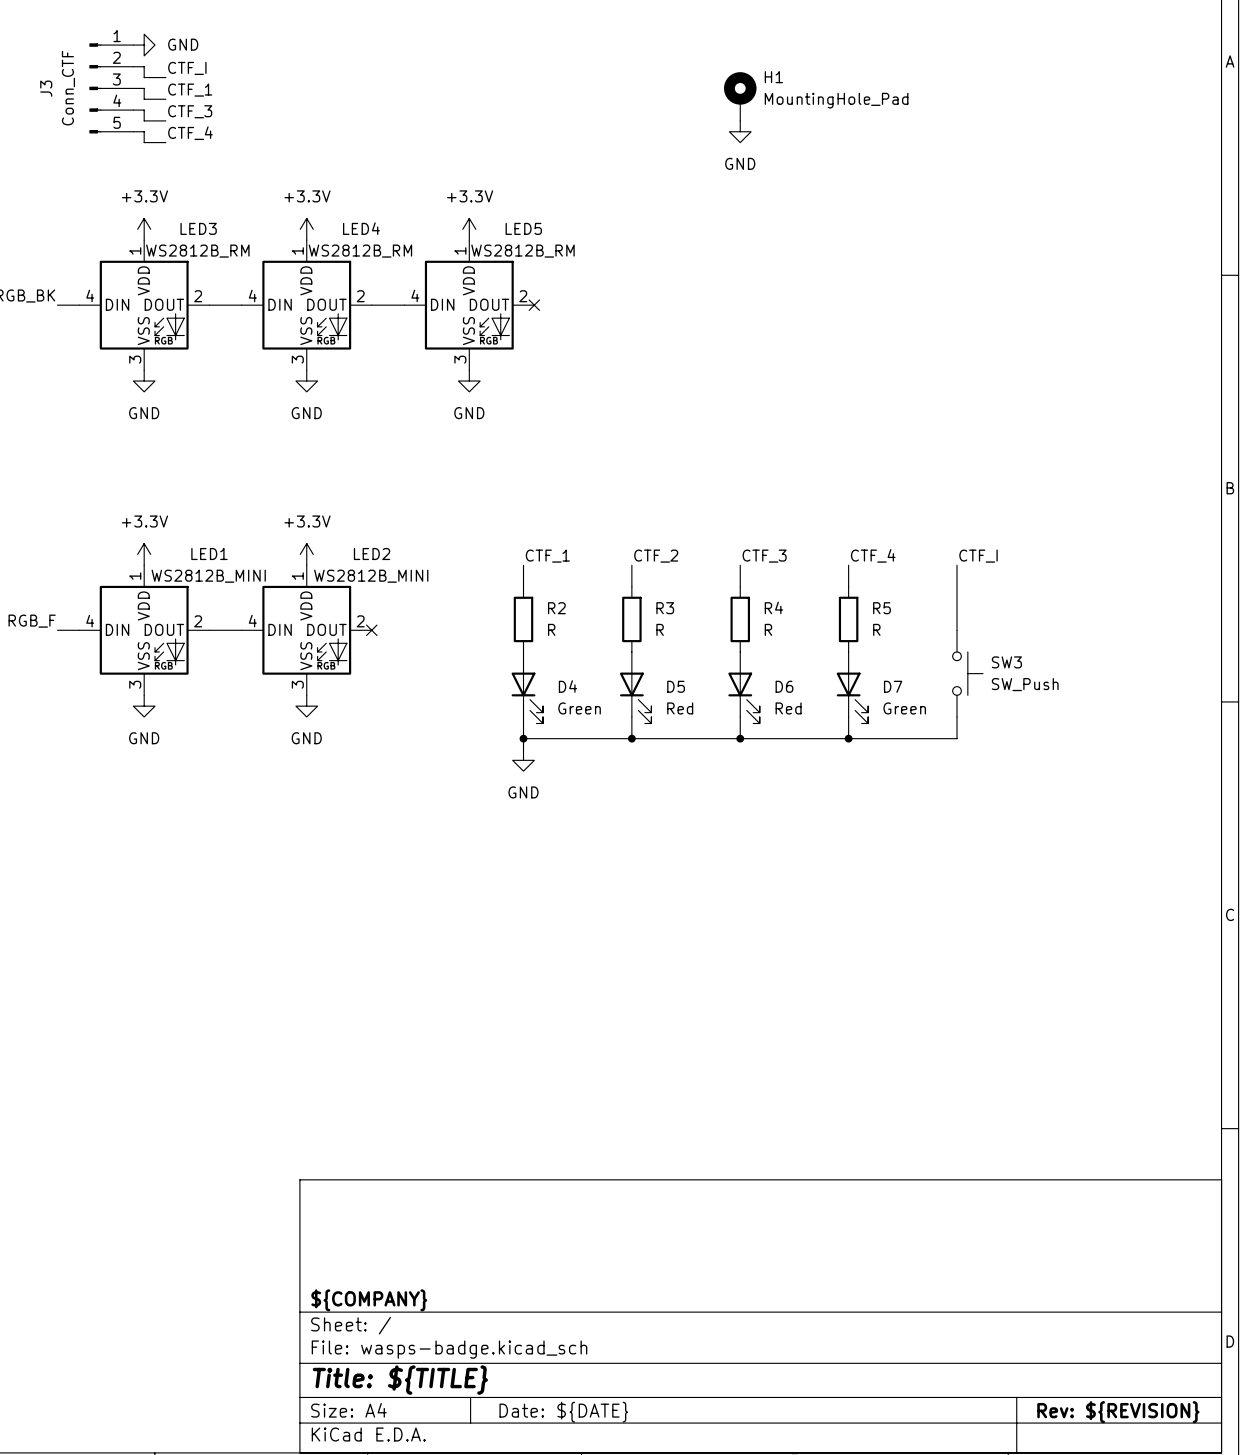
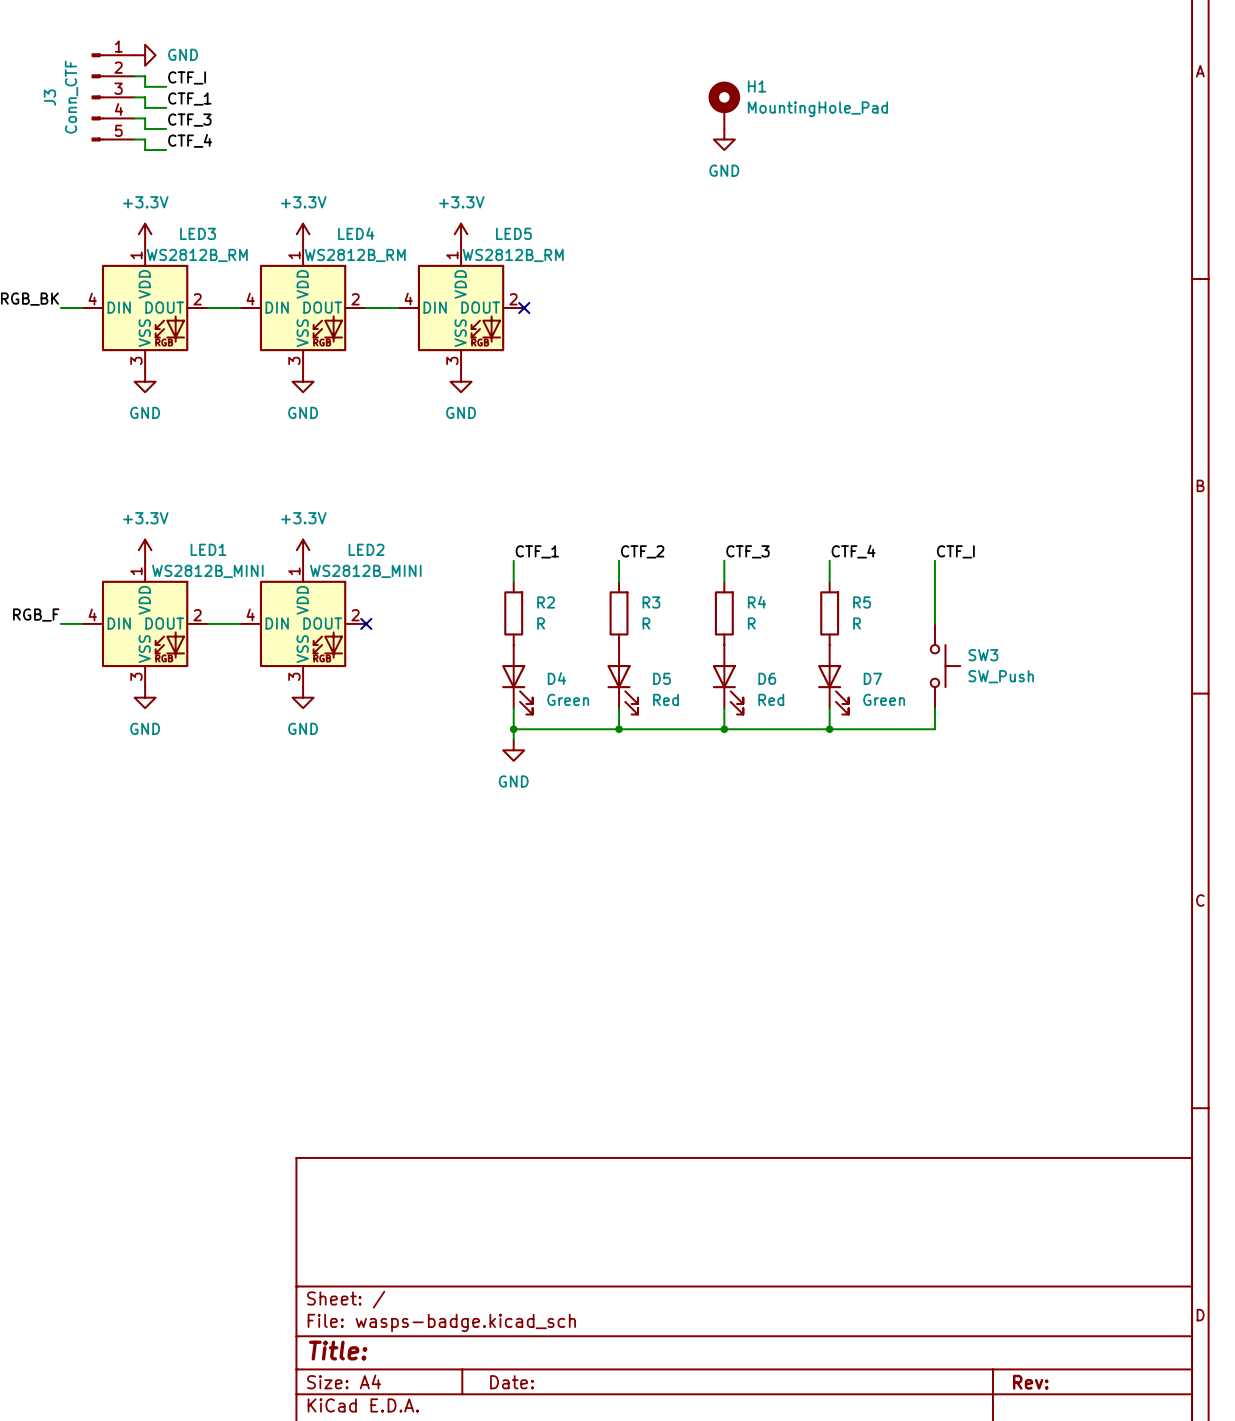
title block: ${COMPANY} (369, 1300) -> none
title block: Title: ${TITLE} (400, 1380) -> Title: (338, 1350)
title block: Date: ${DATE} (563, 1412) -> Date: (512, 1382)
title block: Rev: ${REVISION} (1118, 1412) -> Rev: (1030, 1382)

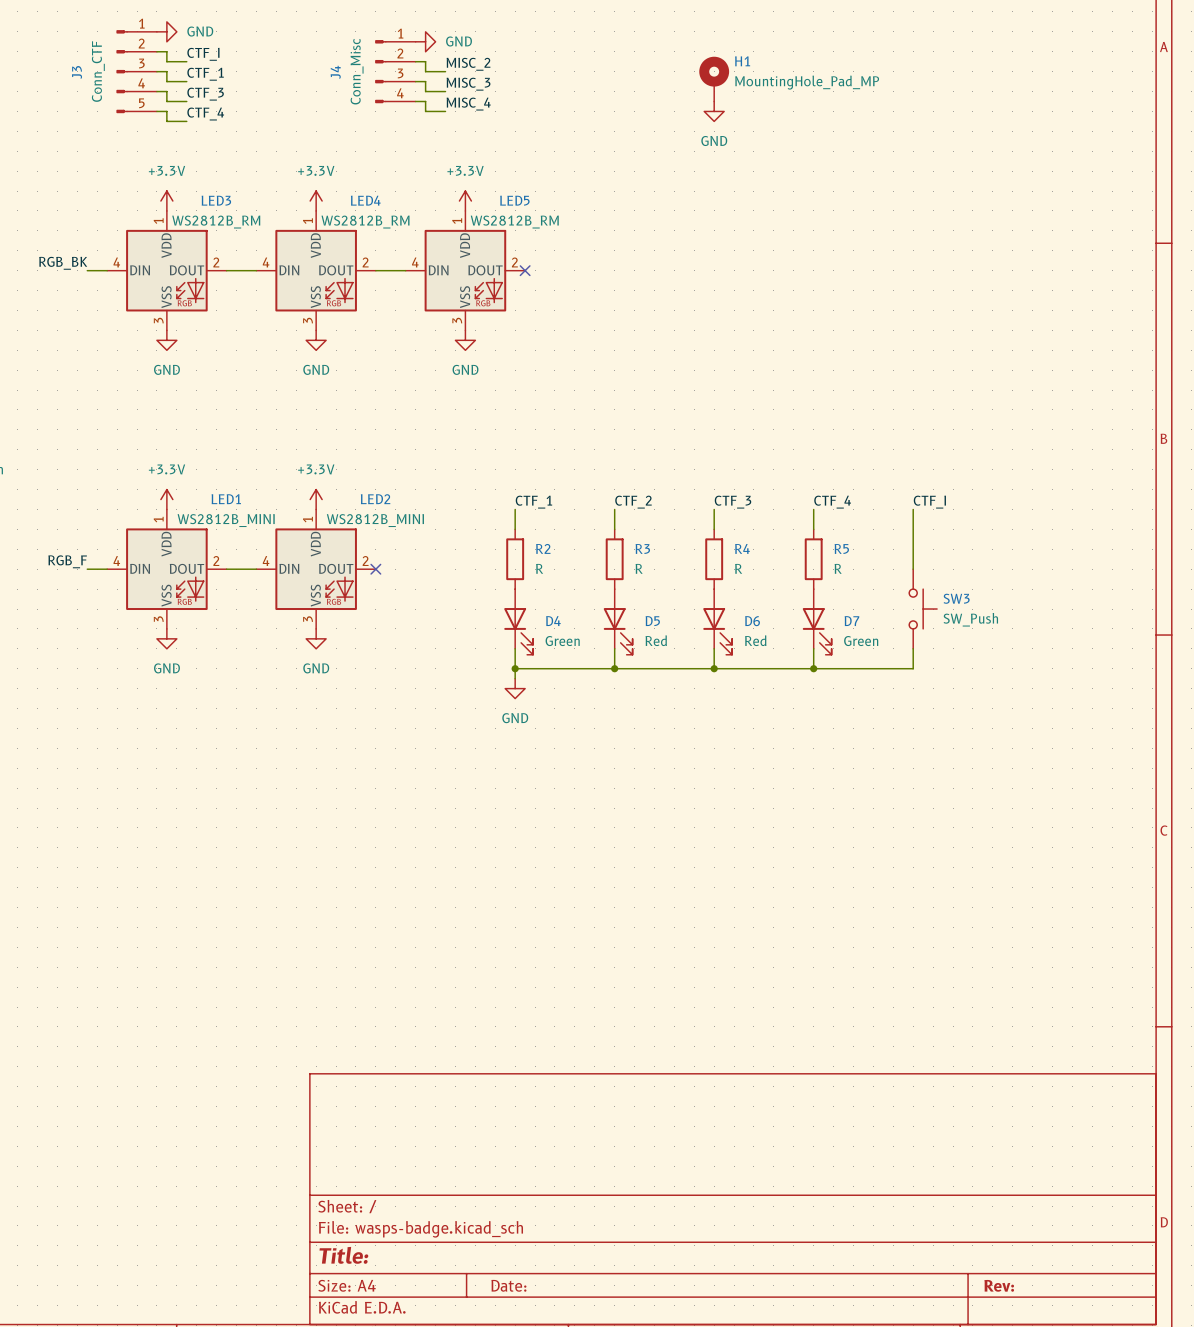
power symbol: none -> GND (425, 41)
wire: none -> (415, 61) (425, 61) (425, 71) (445, 71)
label: none -> MISC_2 (468, 64)
J4: none -> Conn_Misc (395, 71)
wire: none -> (415, 81) (425, 81) (425, 91) (445, 91)
label: none -> MISC_3 (468, 84)
H1 value: MountingHole_Pad (817, 109) -> MountingHole_Pad_MP (807, 82)
wire: none -> (415, 101) (425, 101) (425, 111) (445, 111)
label: none -> MISC_4 (468, 104)

